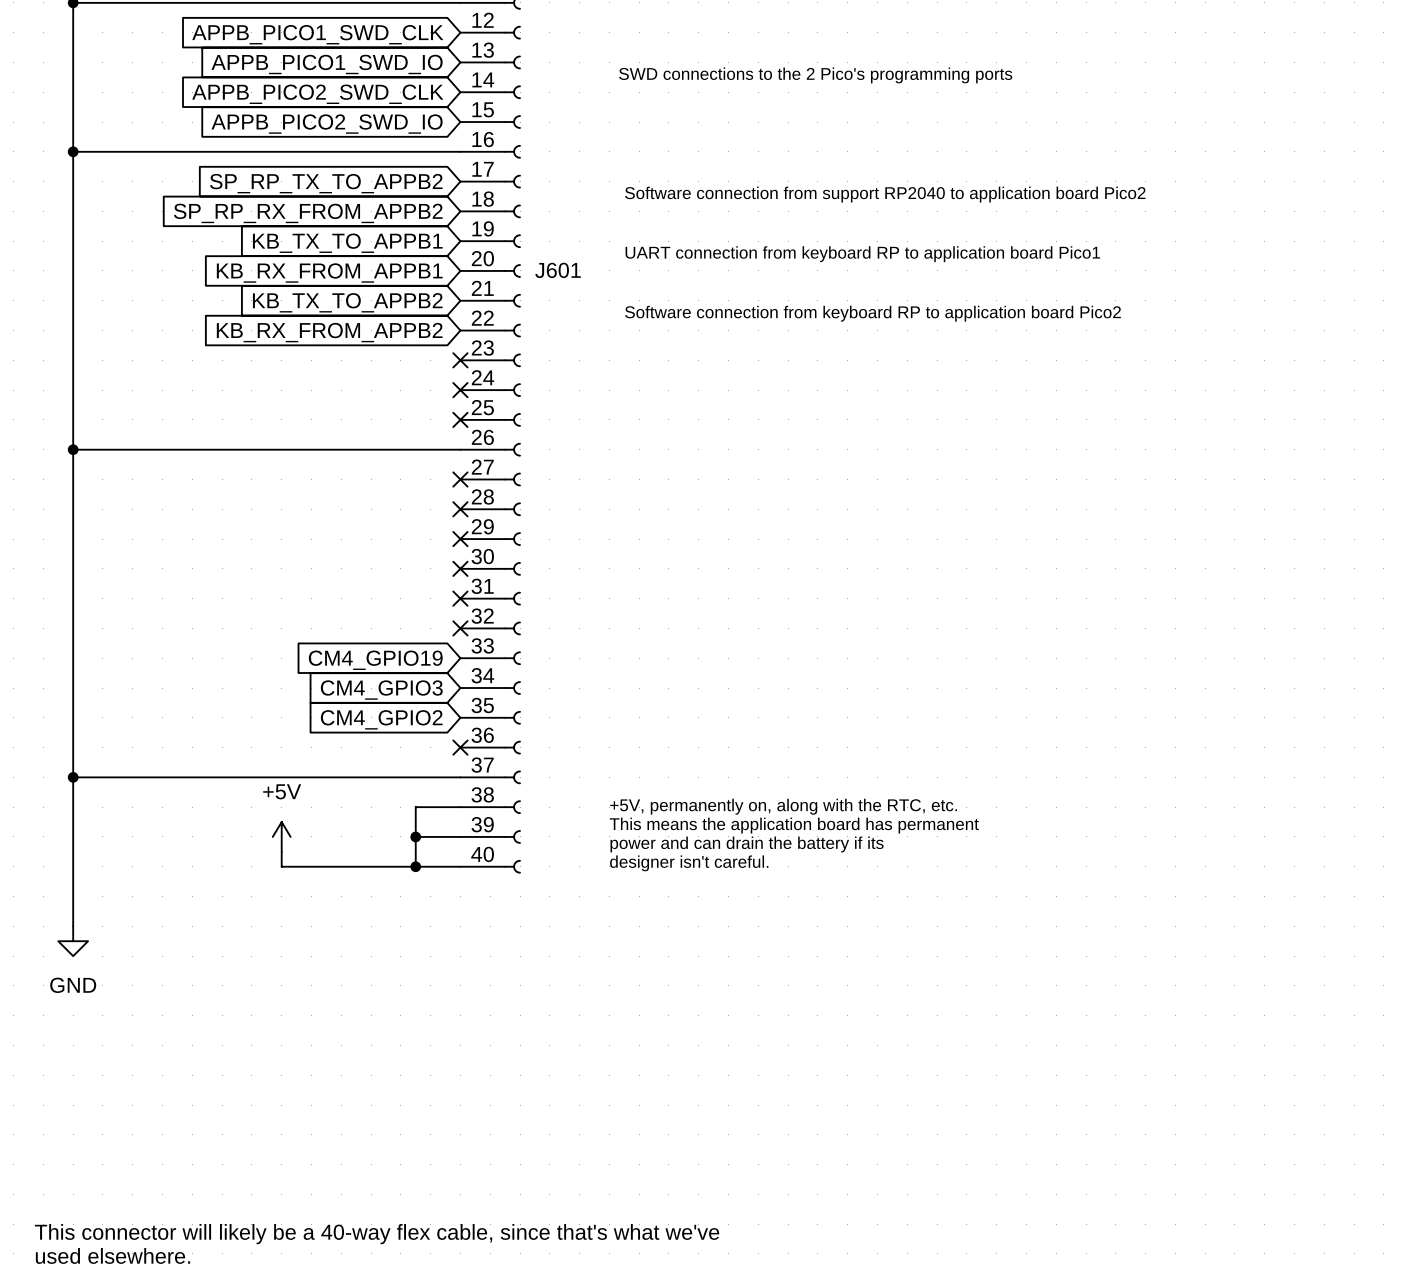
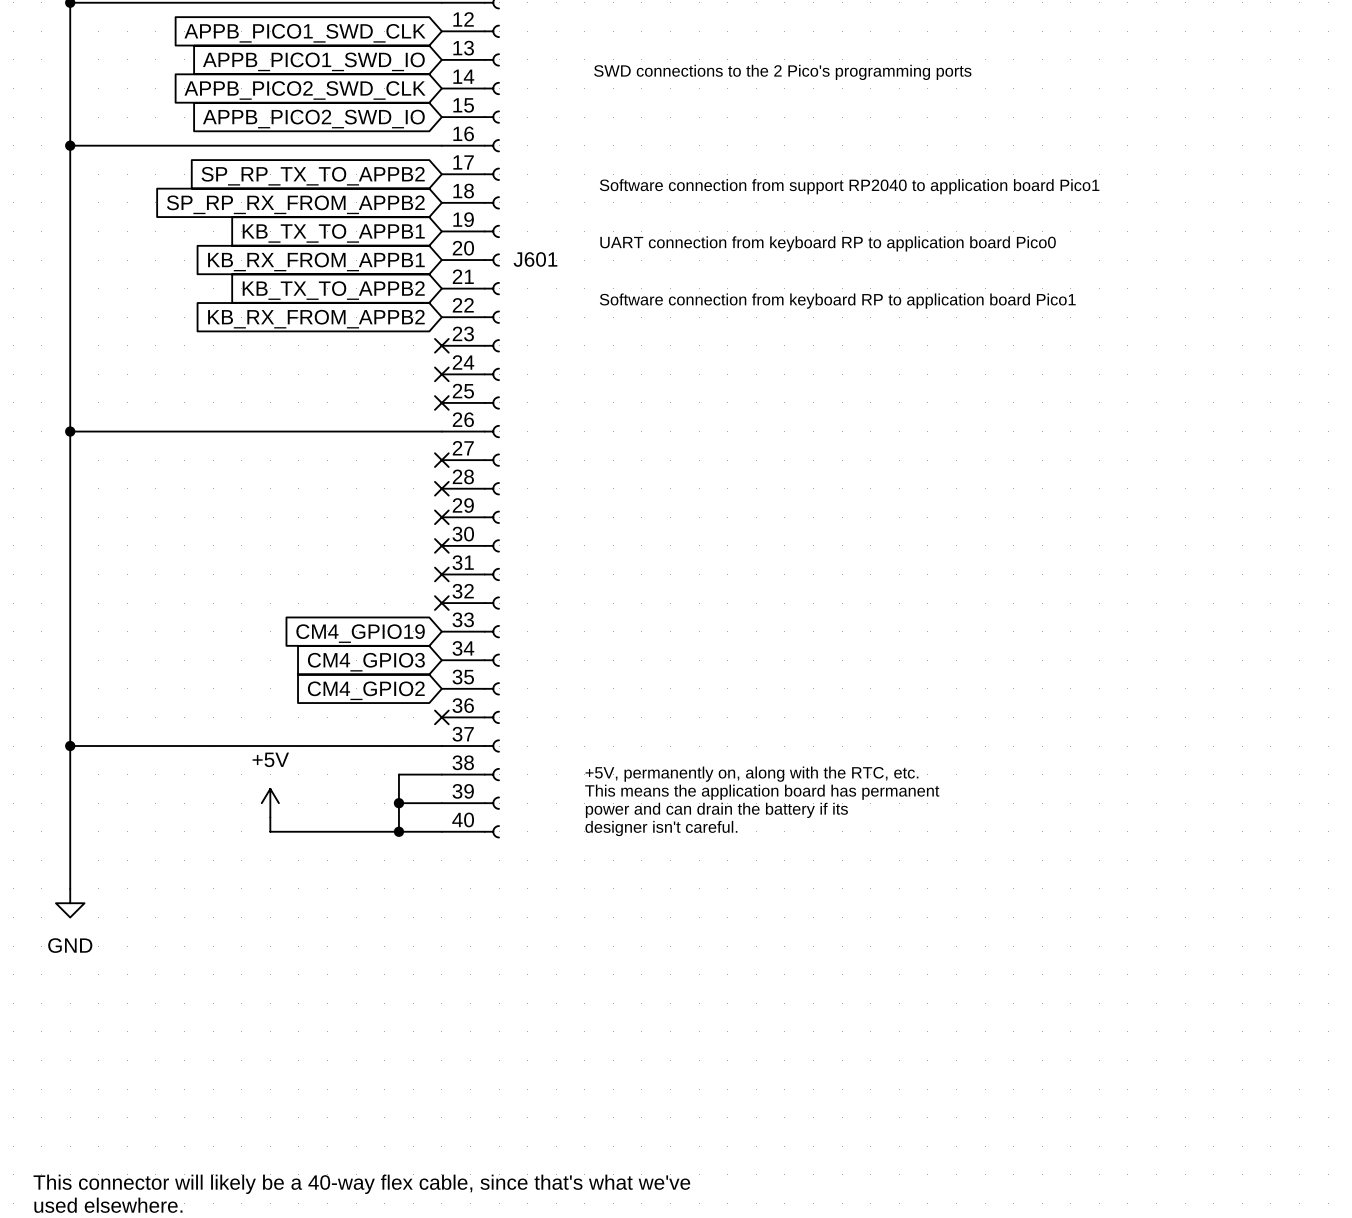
text: Software connection from support RP2040 to application board Pico2 (885, 194) -> Software connection from support RP2040 to application board Pico1 (849, 186)
text: UART connection from keyboard RP to application board Pico1 (862, 254) -> UART connection from keyboard RP to application board Pico0 (828, 243)
text: Software connection from keyboard RP to application board Pico2 (872, 313) -> Software connection from keyboard RP to application board Pico1 (837, 301)

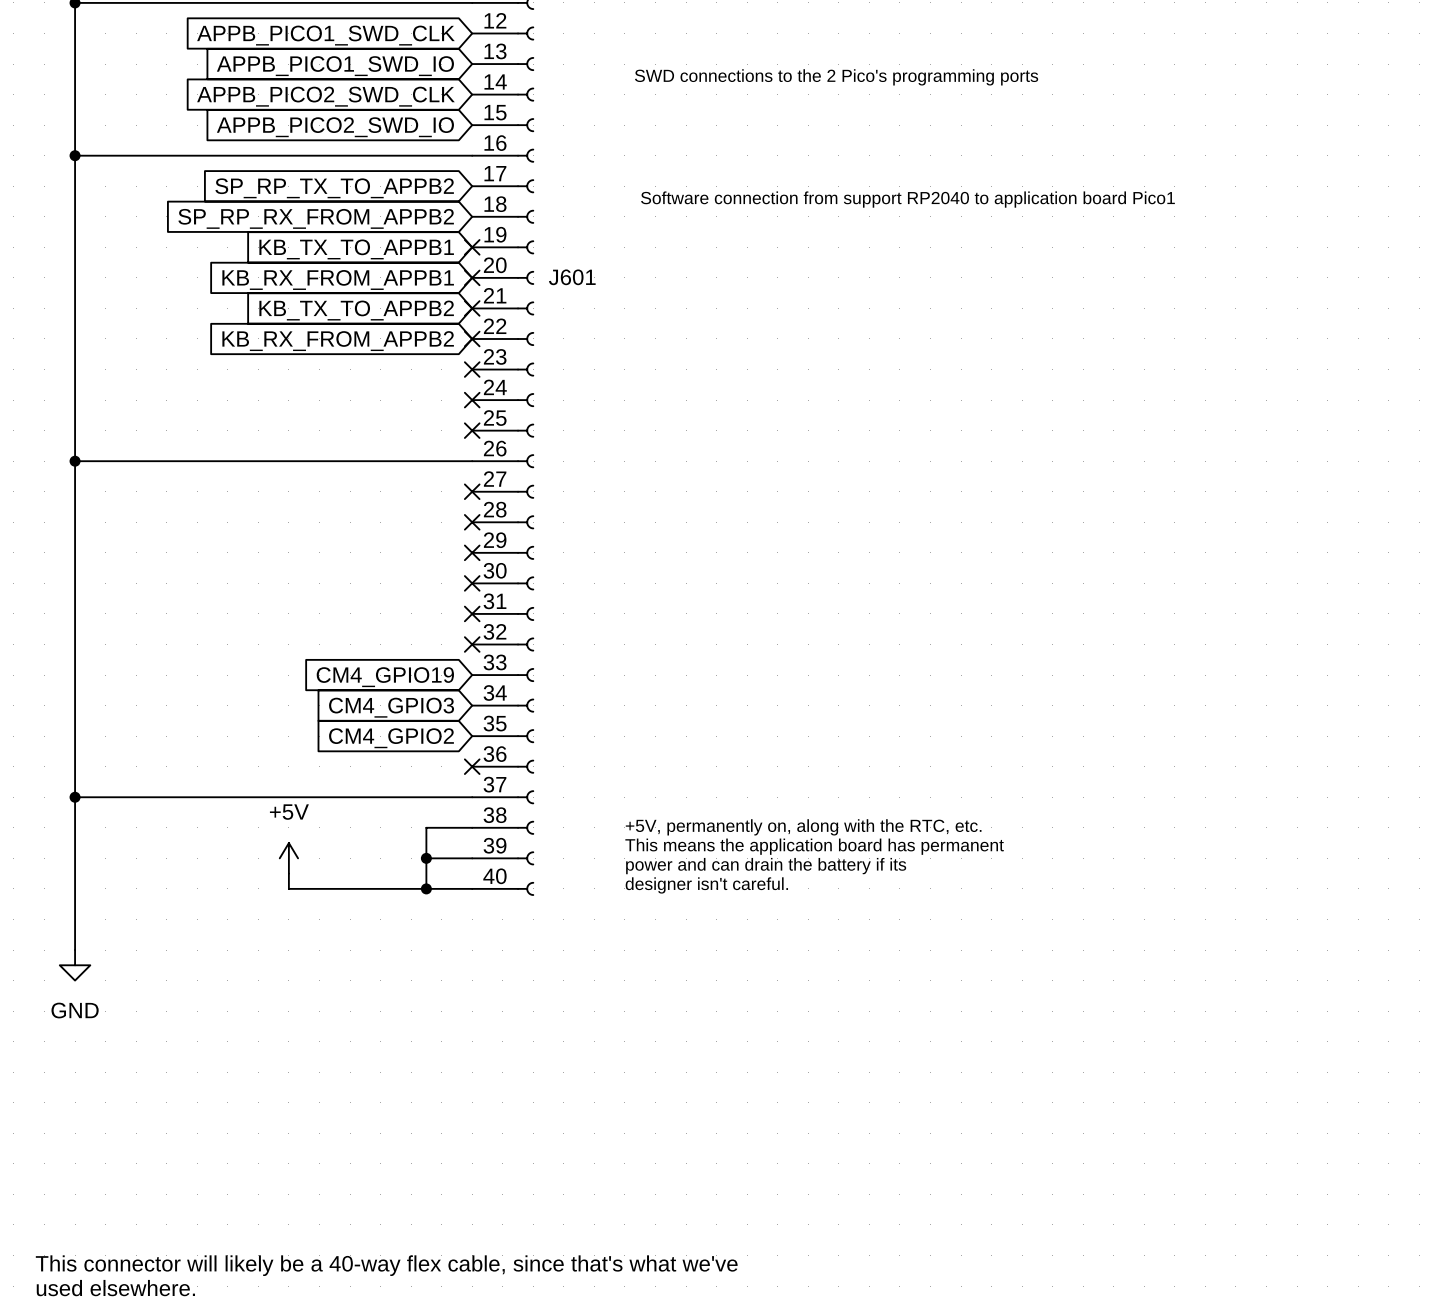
no-connect mark: none -> (472, 247)
text: UART connection from keyboard RP to application board Pico0 (828, 243) -> none
no-connect mark: none -> (472, 277)
no-connect mark: none -> (472, 308)
text: Software connection from keyboard RP to application board Pico1 (837, 301) -> none
no-connect mark: none -> (472, 338)

